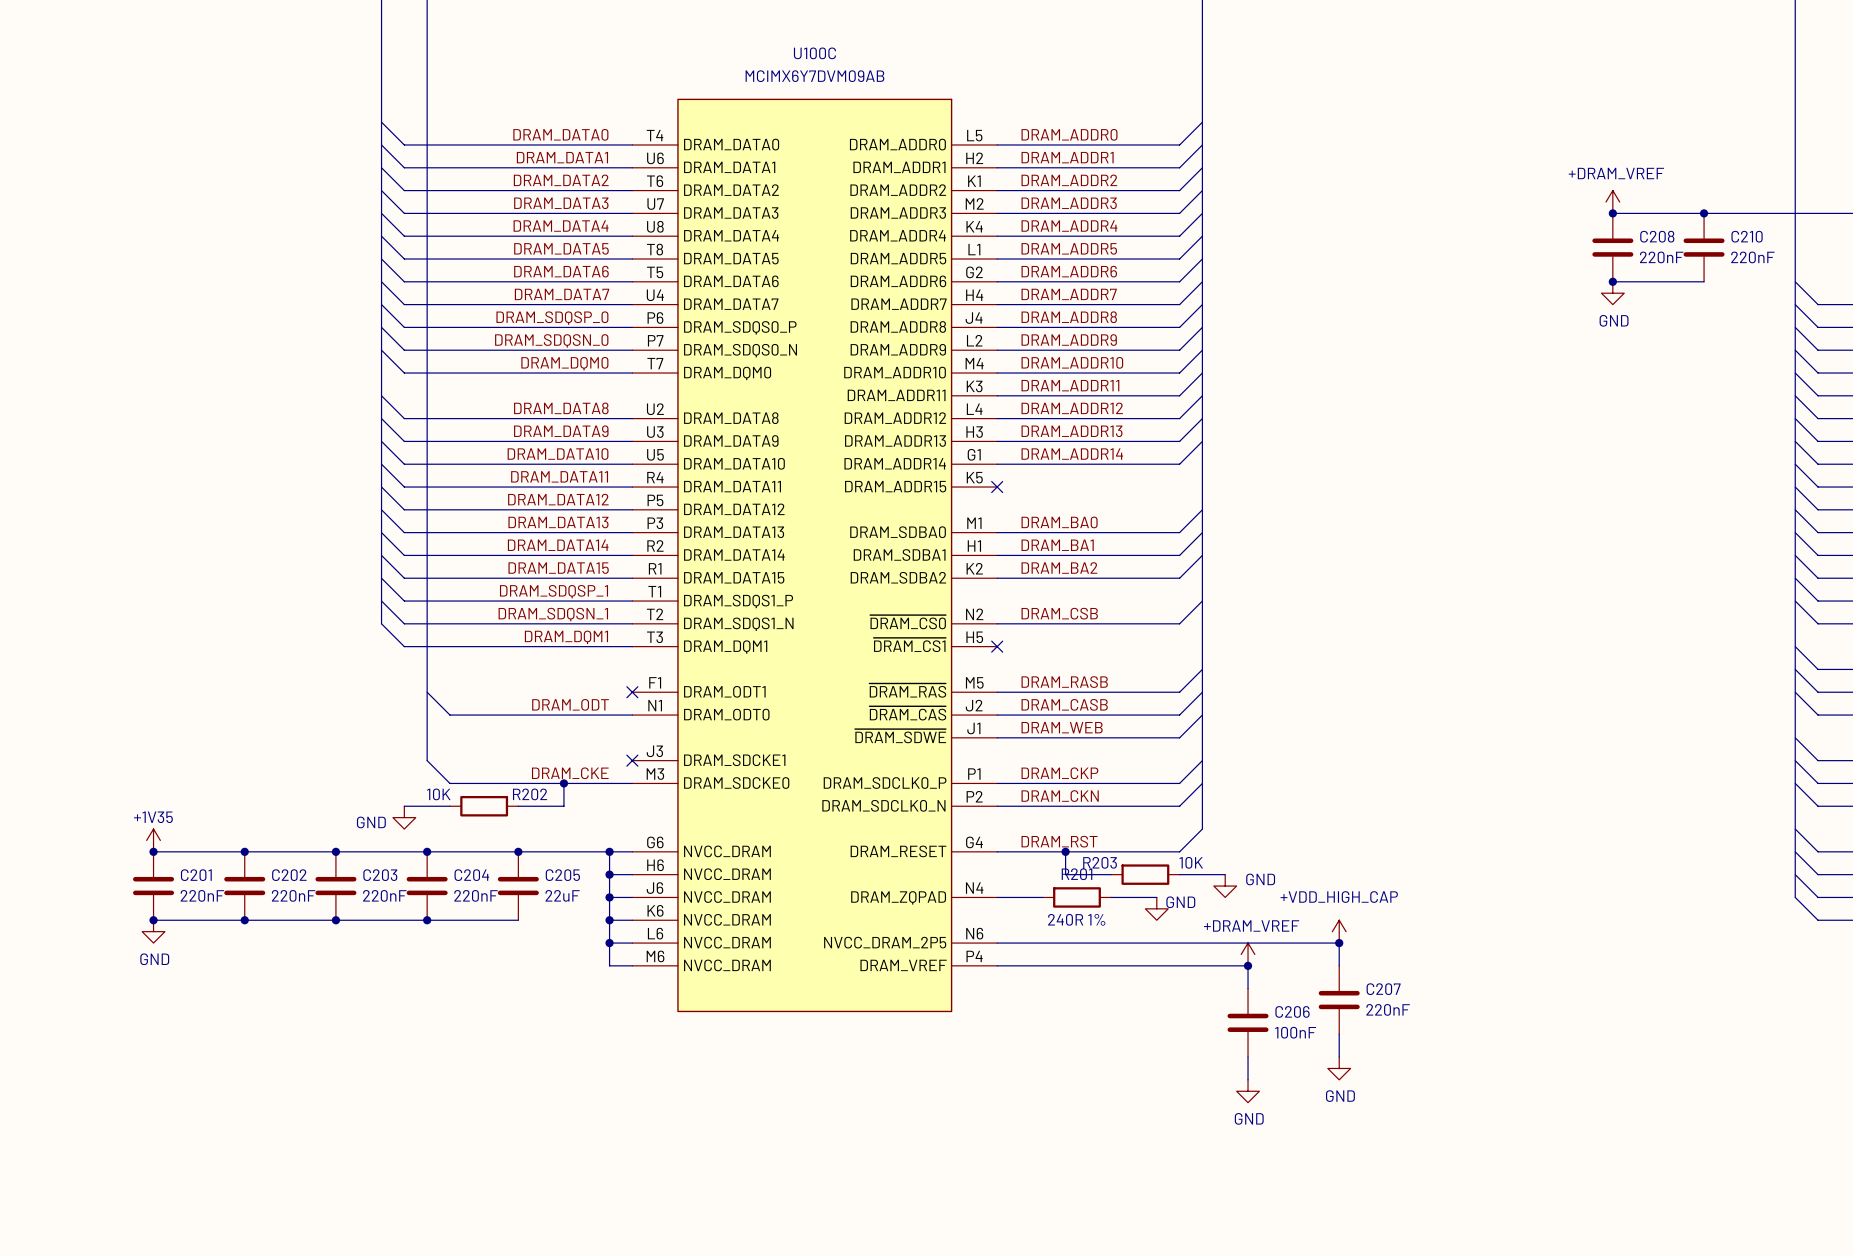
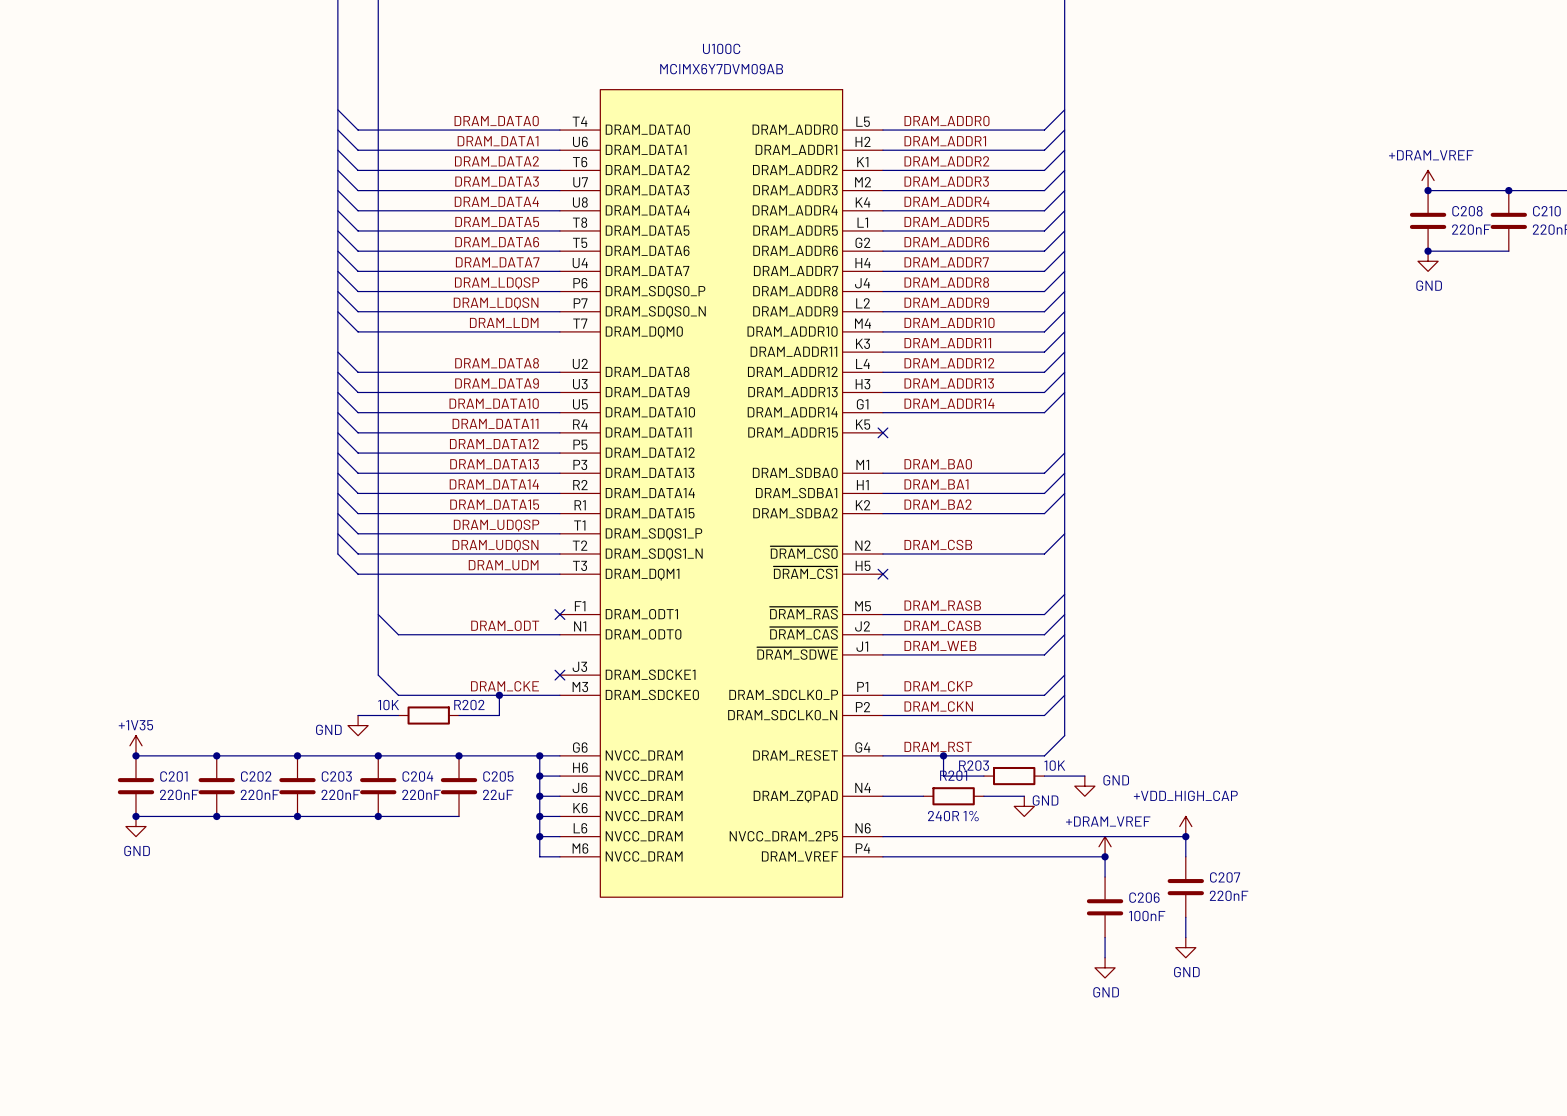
label: DRAM_SDQSP_0 (552, 318) -> DRAM_LDQSP (497, 283)
label: DRAM_SDQSN_0 (551, 340) -> DRAM_LDQSN (496, 303)
label: DRAM_DQM0 (564, 363) -> DRAM_LDM (504, 322)
label: DRAM_SDQSP_1 (554, 591) -> DRAM_UDQSP (496, 525)
label: DRAM_SDQSN_1 (553, 614) -> DRAM_UDQSN (495, 545)
label: DRAM_DQM1 (566, 637) -> DRAM_UDM (503, 565)

